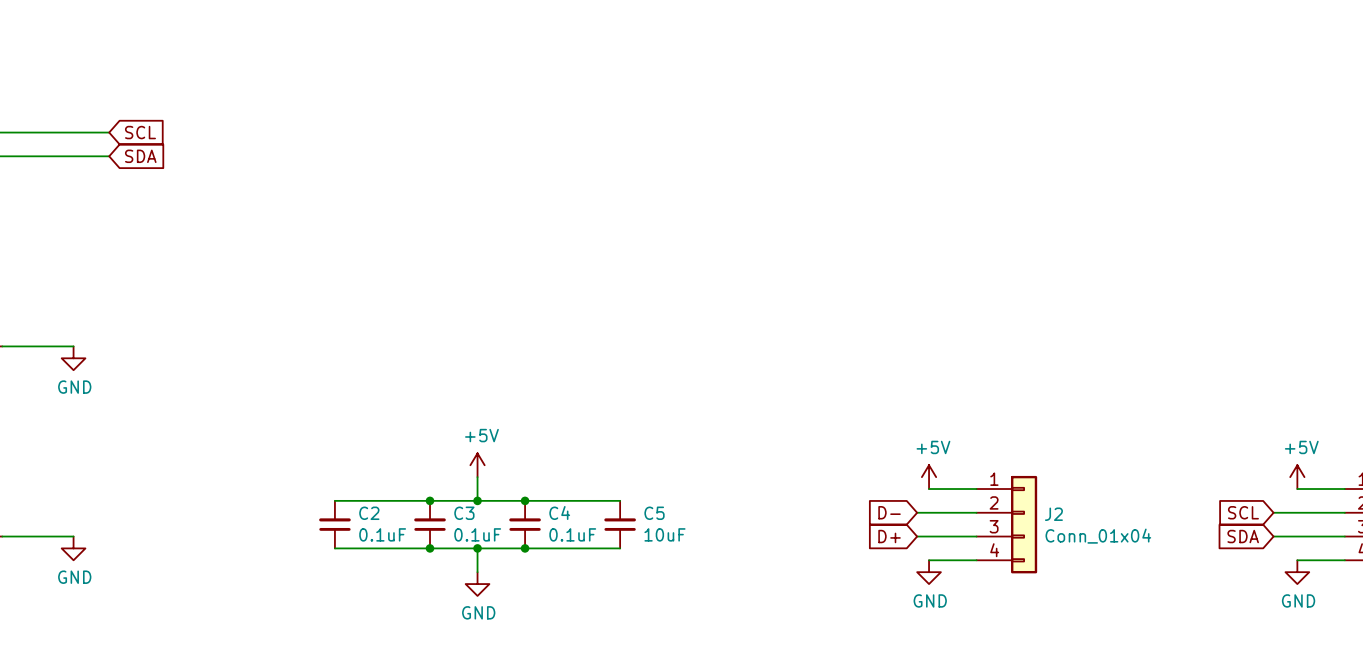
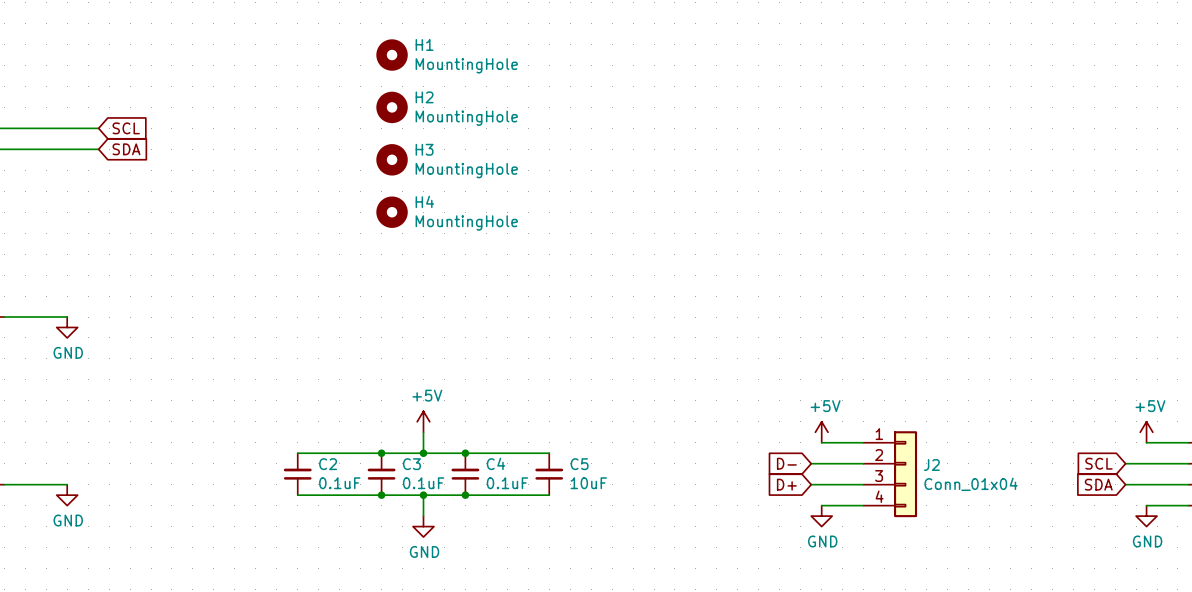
H1: none -> MountingHole (392, 55)
H2: none -> MountingHole (392, 107)
H3: none -> MountingHole (392, 159)
H4: none -> MountingHole (392, 212)

